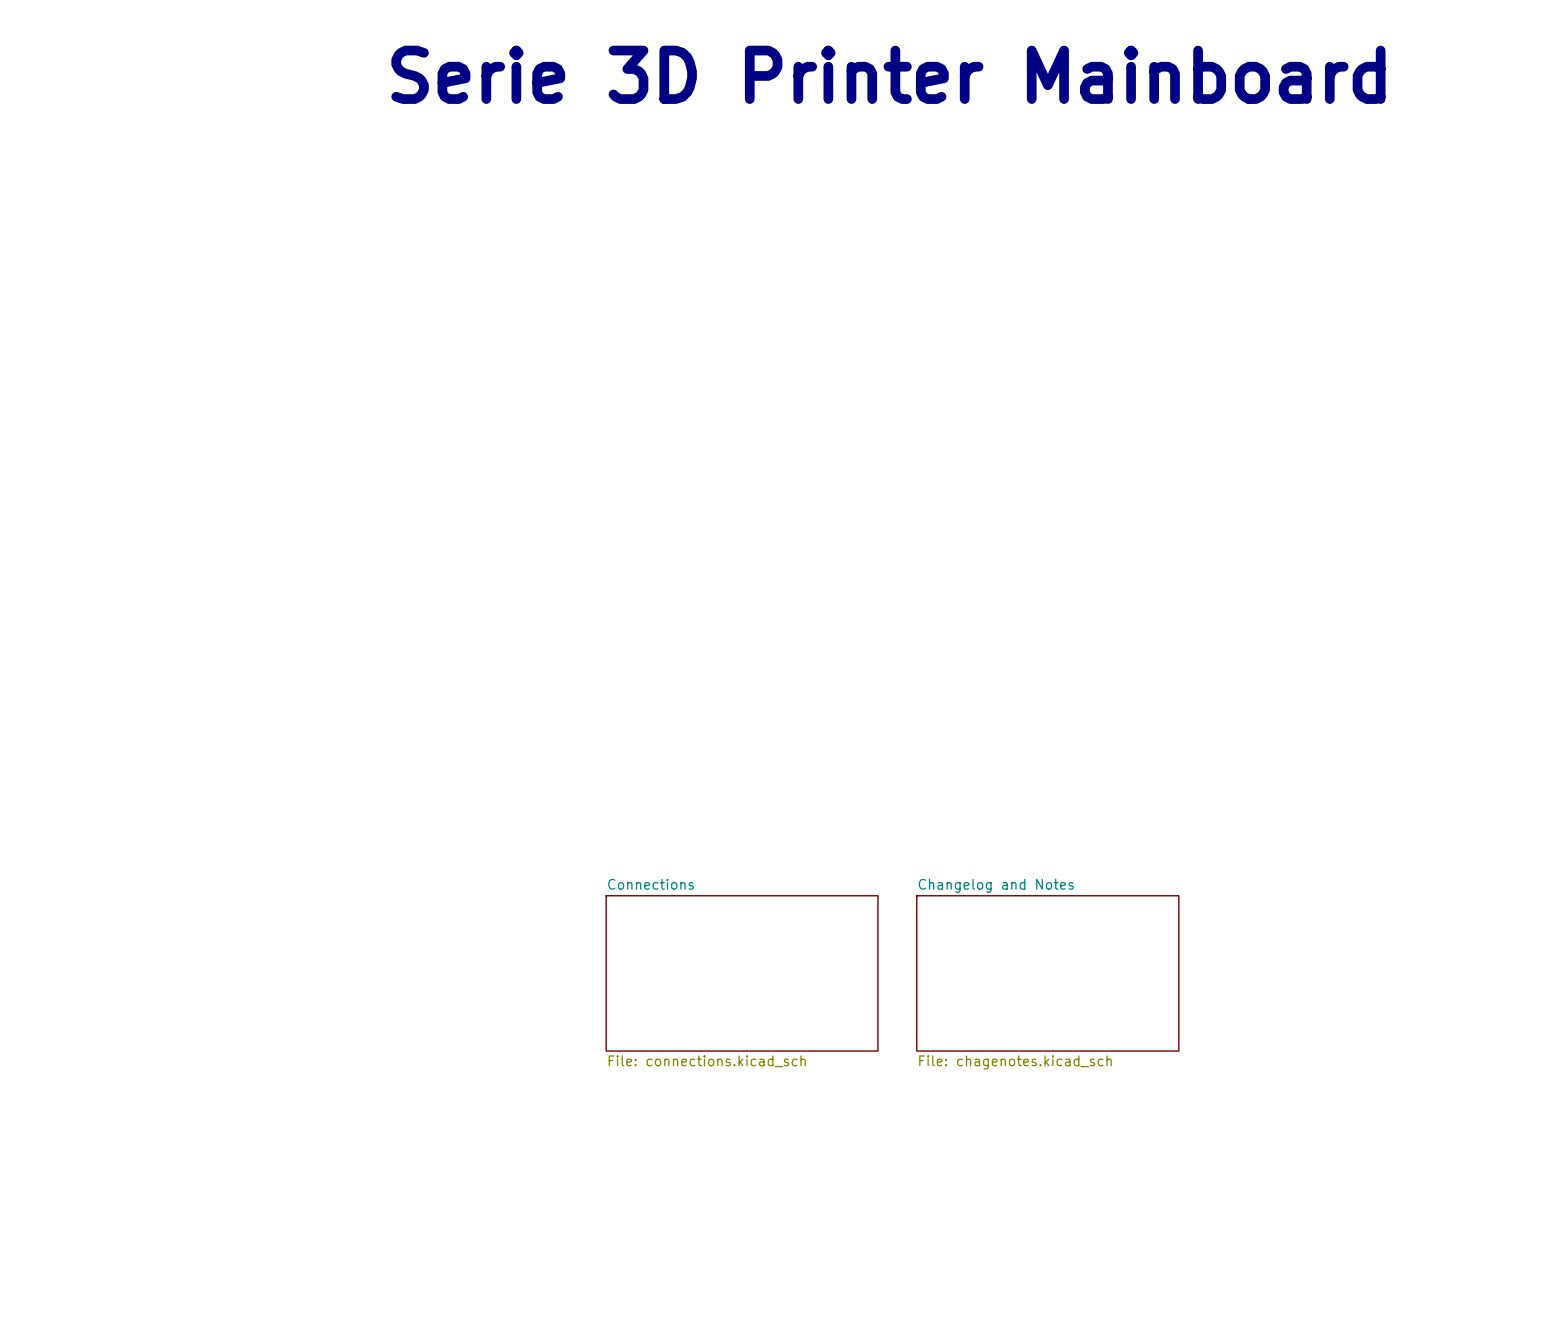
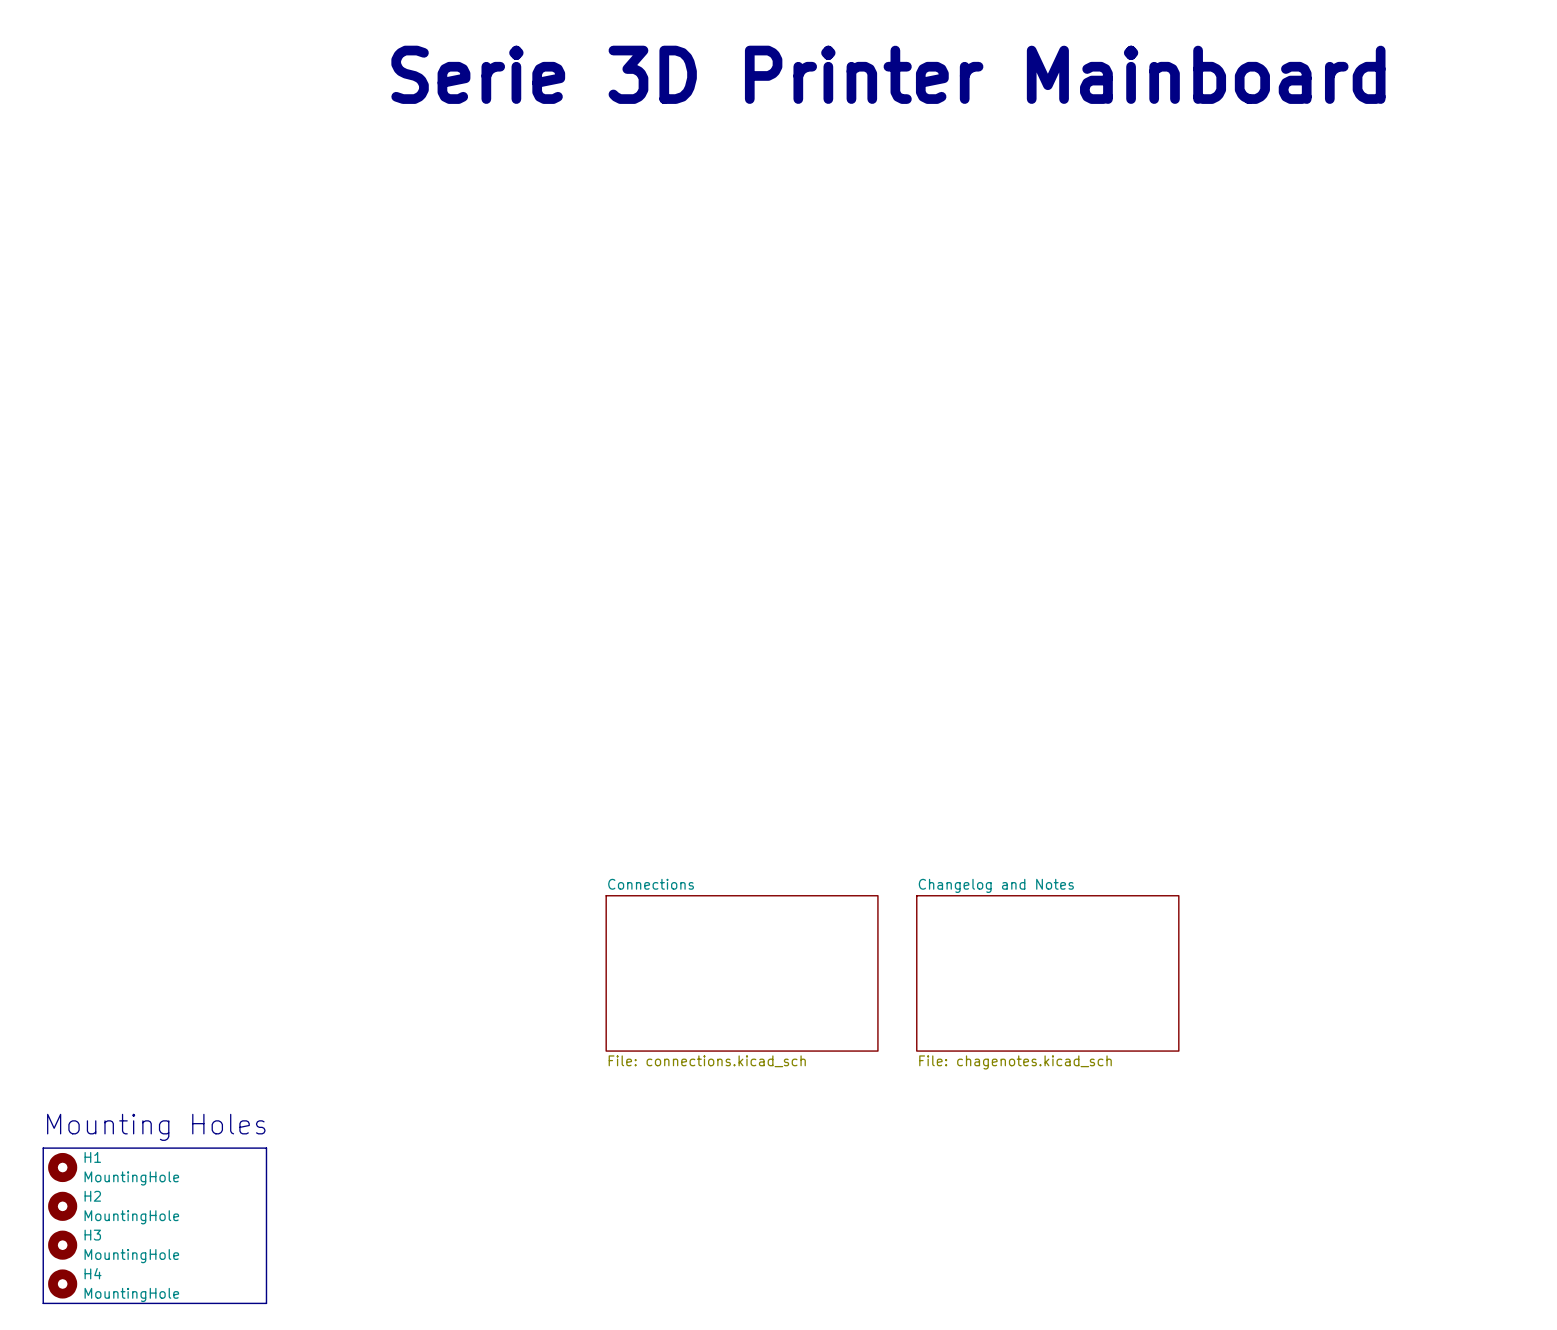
text: none -> Mounting Holes (156, 1127)
line: none -> (43, 1148) (266, 1148) (266, 1303) (43, 1303) (43, 1148)
H1: none -> MountingHole (62, 1167)
H2: none -> MountingHole (62, 1206)
H3: none -> MountingHole (62, 1245)
H4: none -> MountingHole (62, 1283)

